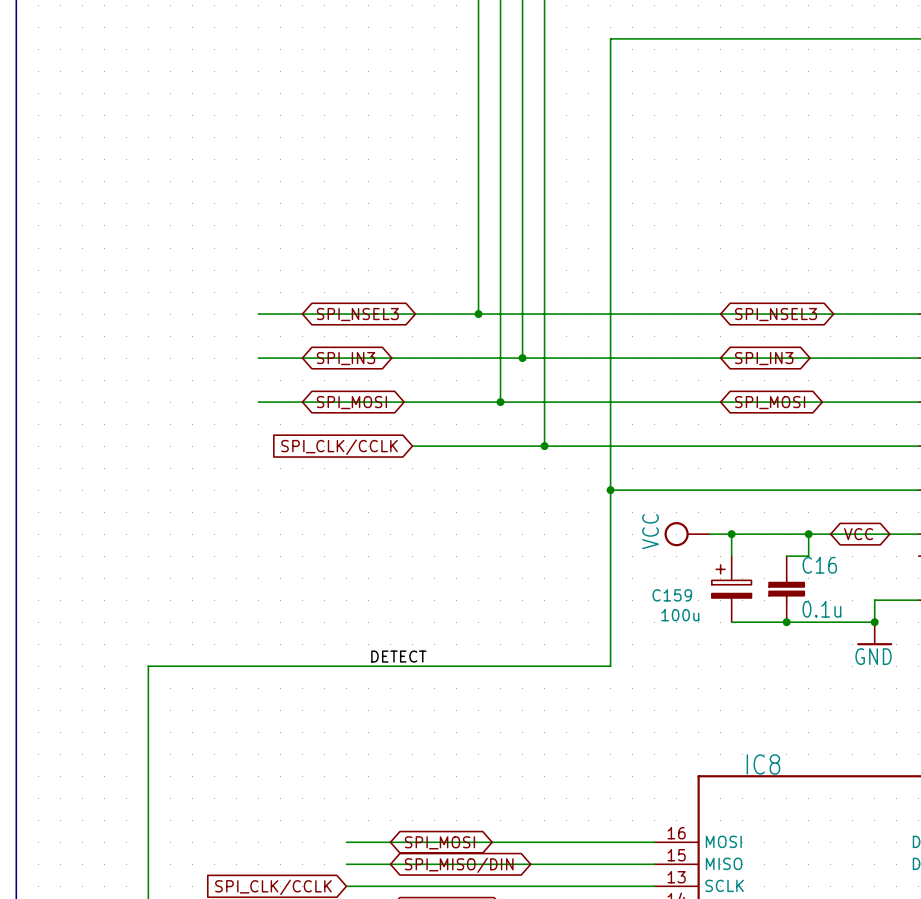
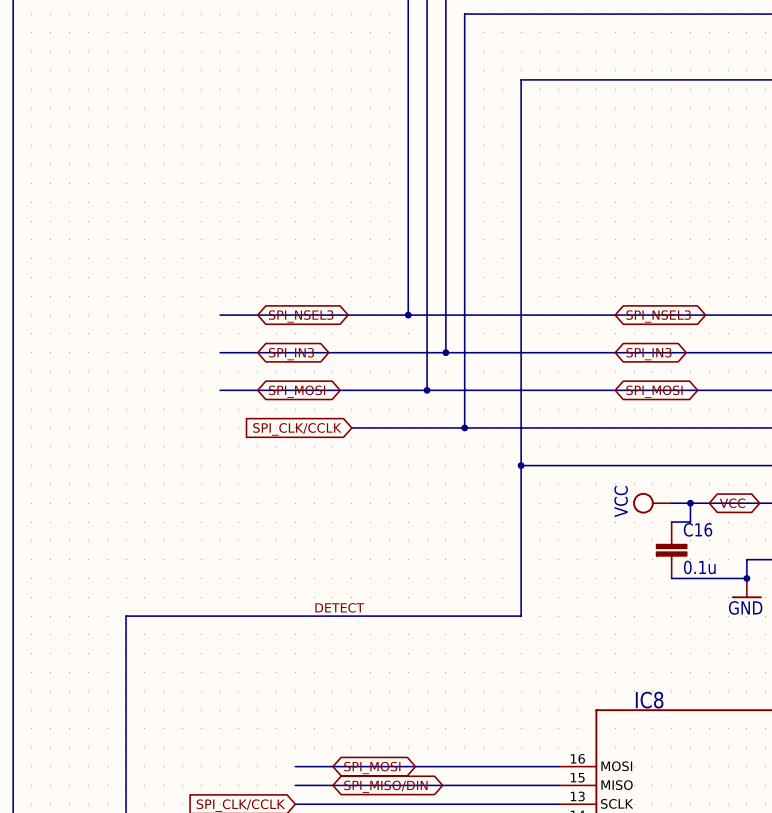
power symbol position: VCC (687, 534) -> VCC (652, 503)
wire: (709, 534) (786, 534) -> none
wire: (731, 534) (731, 556) -> none
junction: (731, 534) -> none
C159: 100u (731, 589) -> none
wire: (731, 622) (786, 622) -> none
junction: (786, 622) -> none

